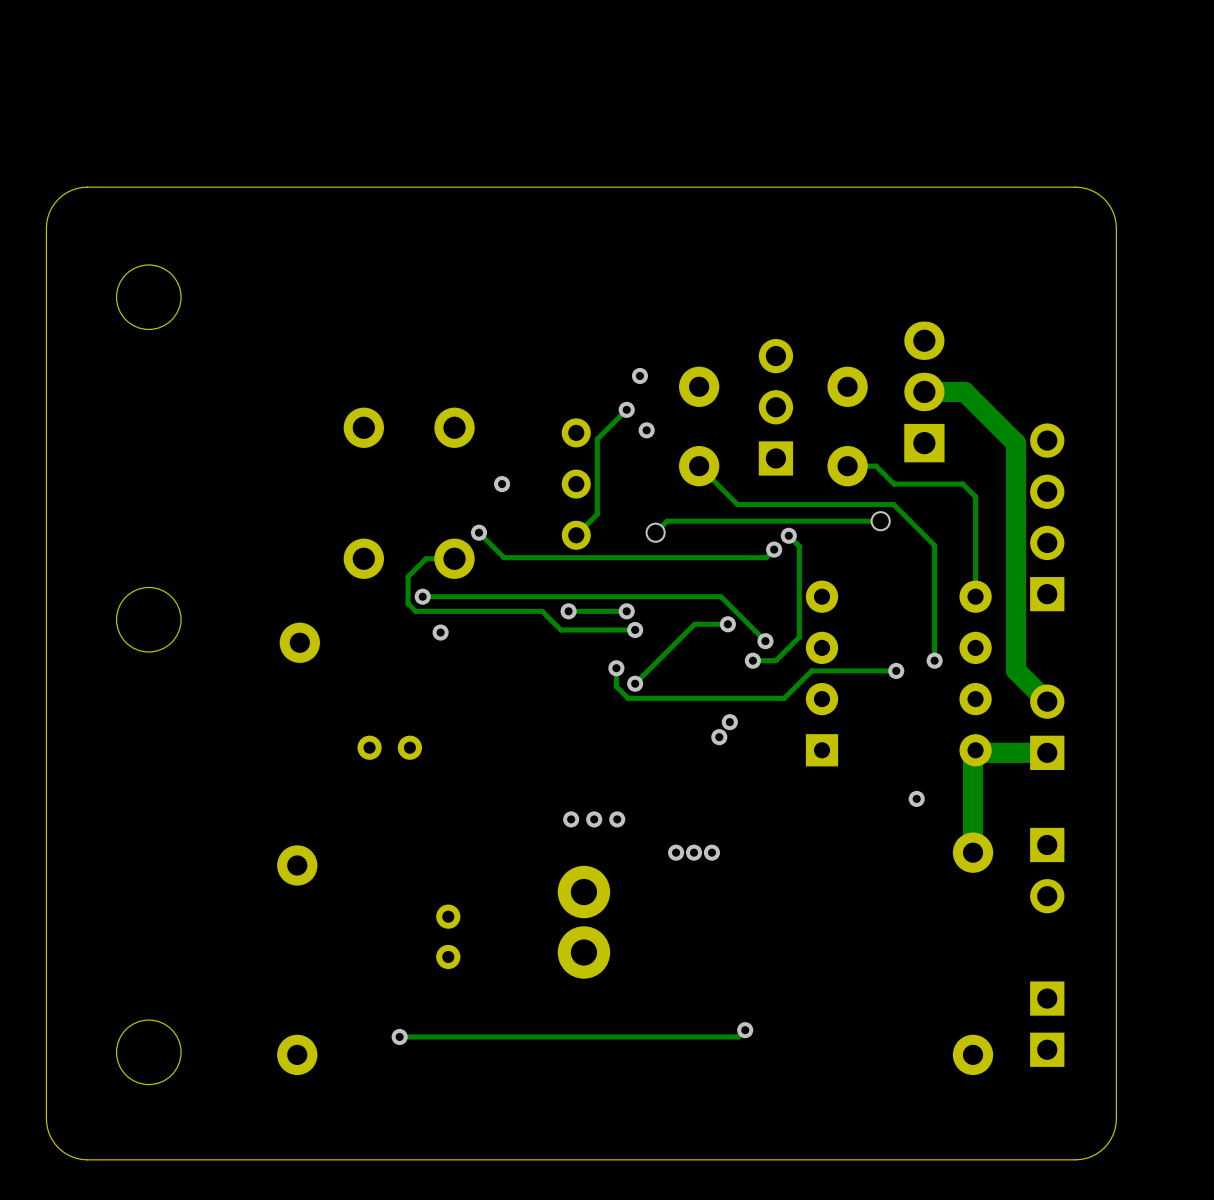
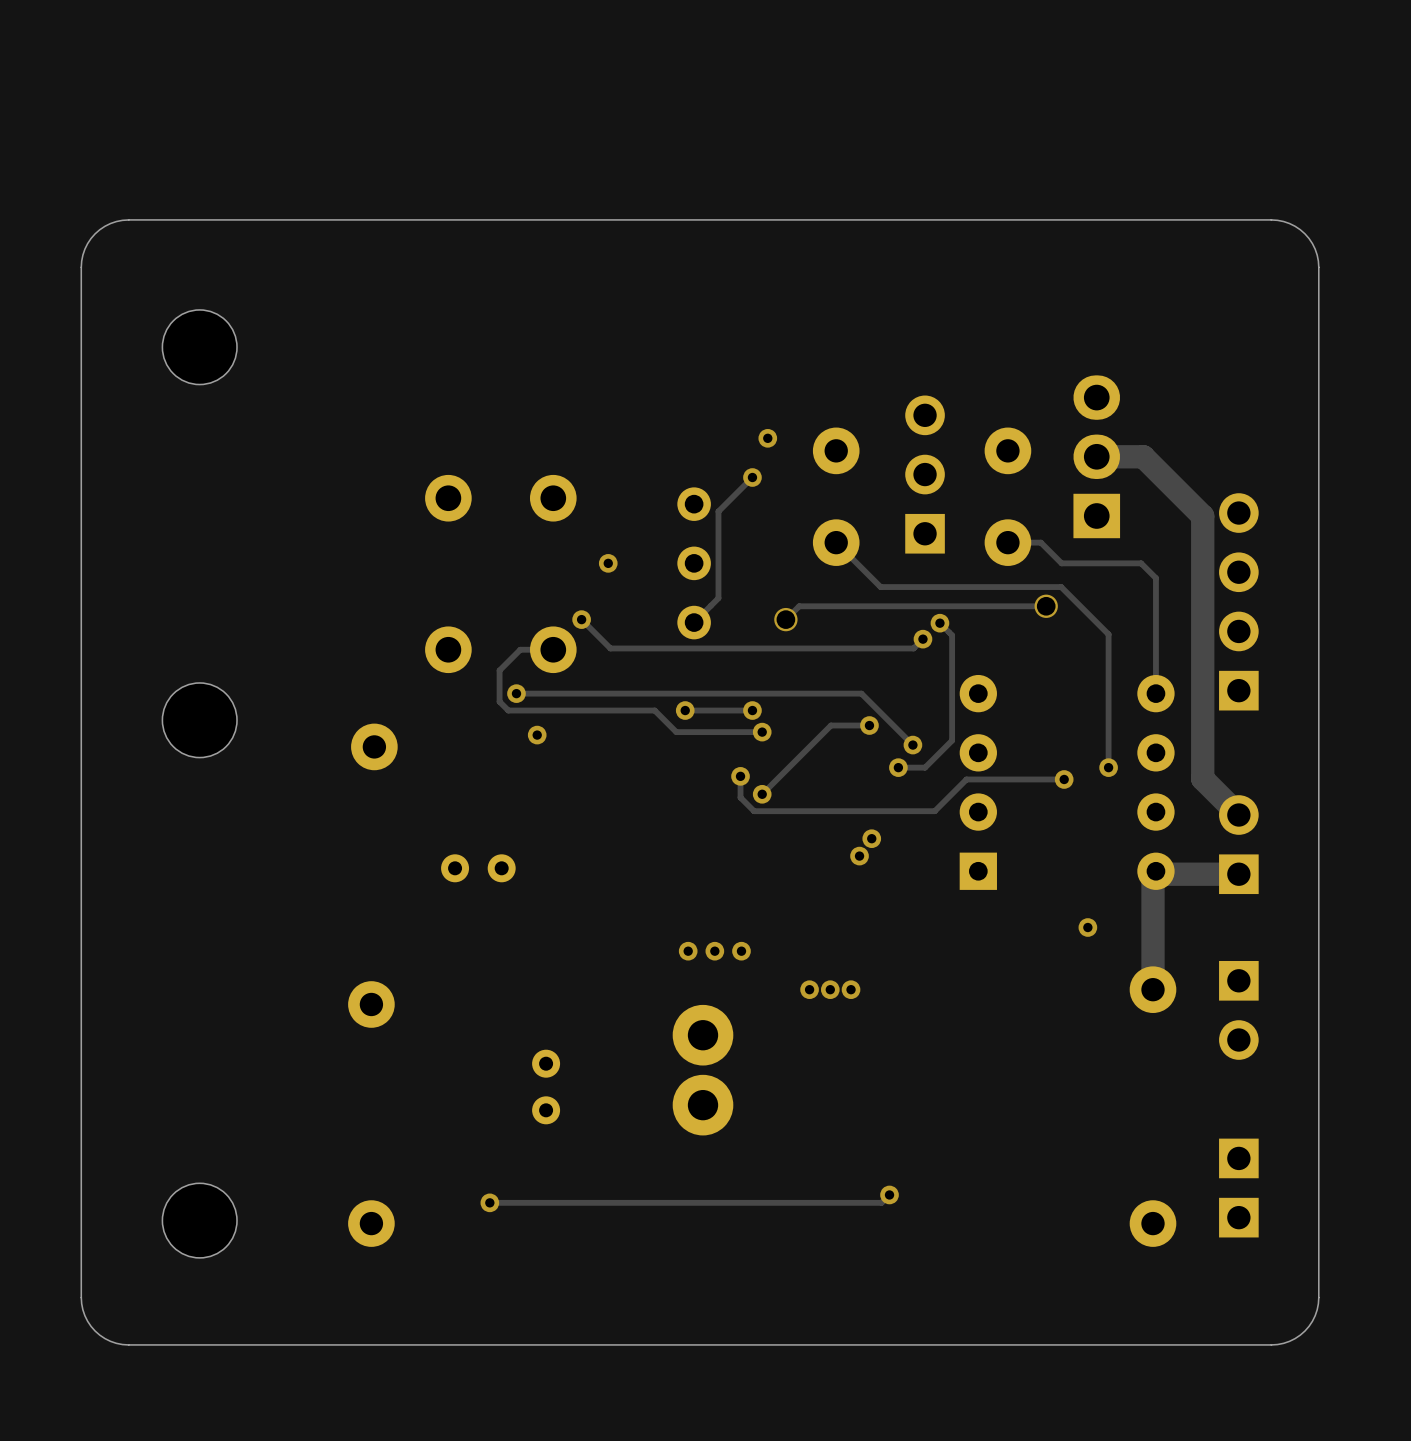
via: (646, 430) -> none

